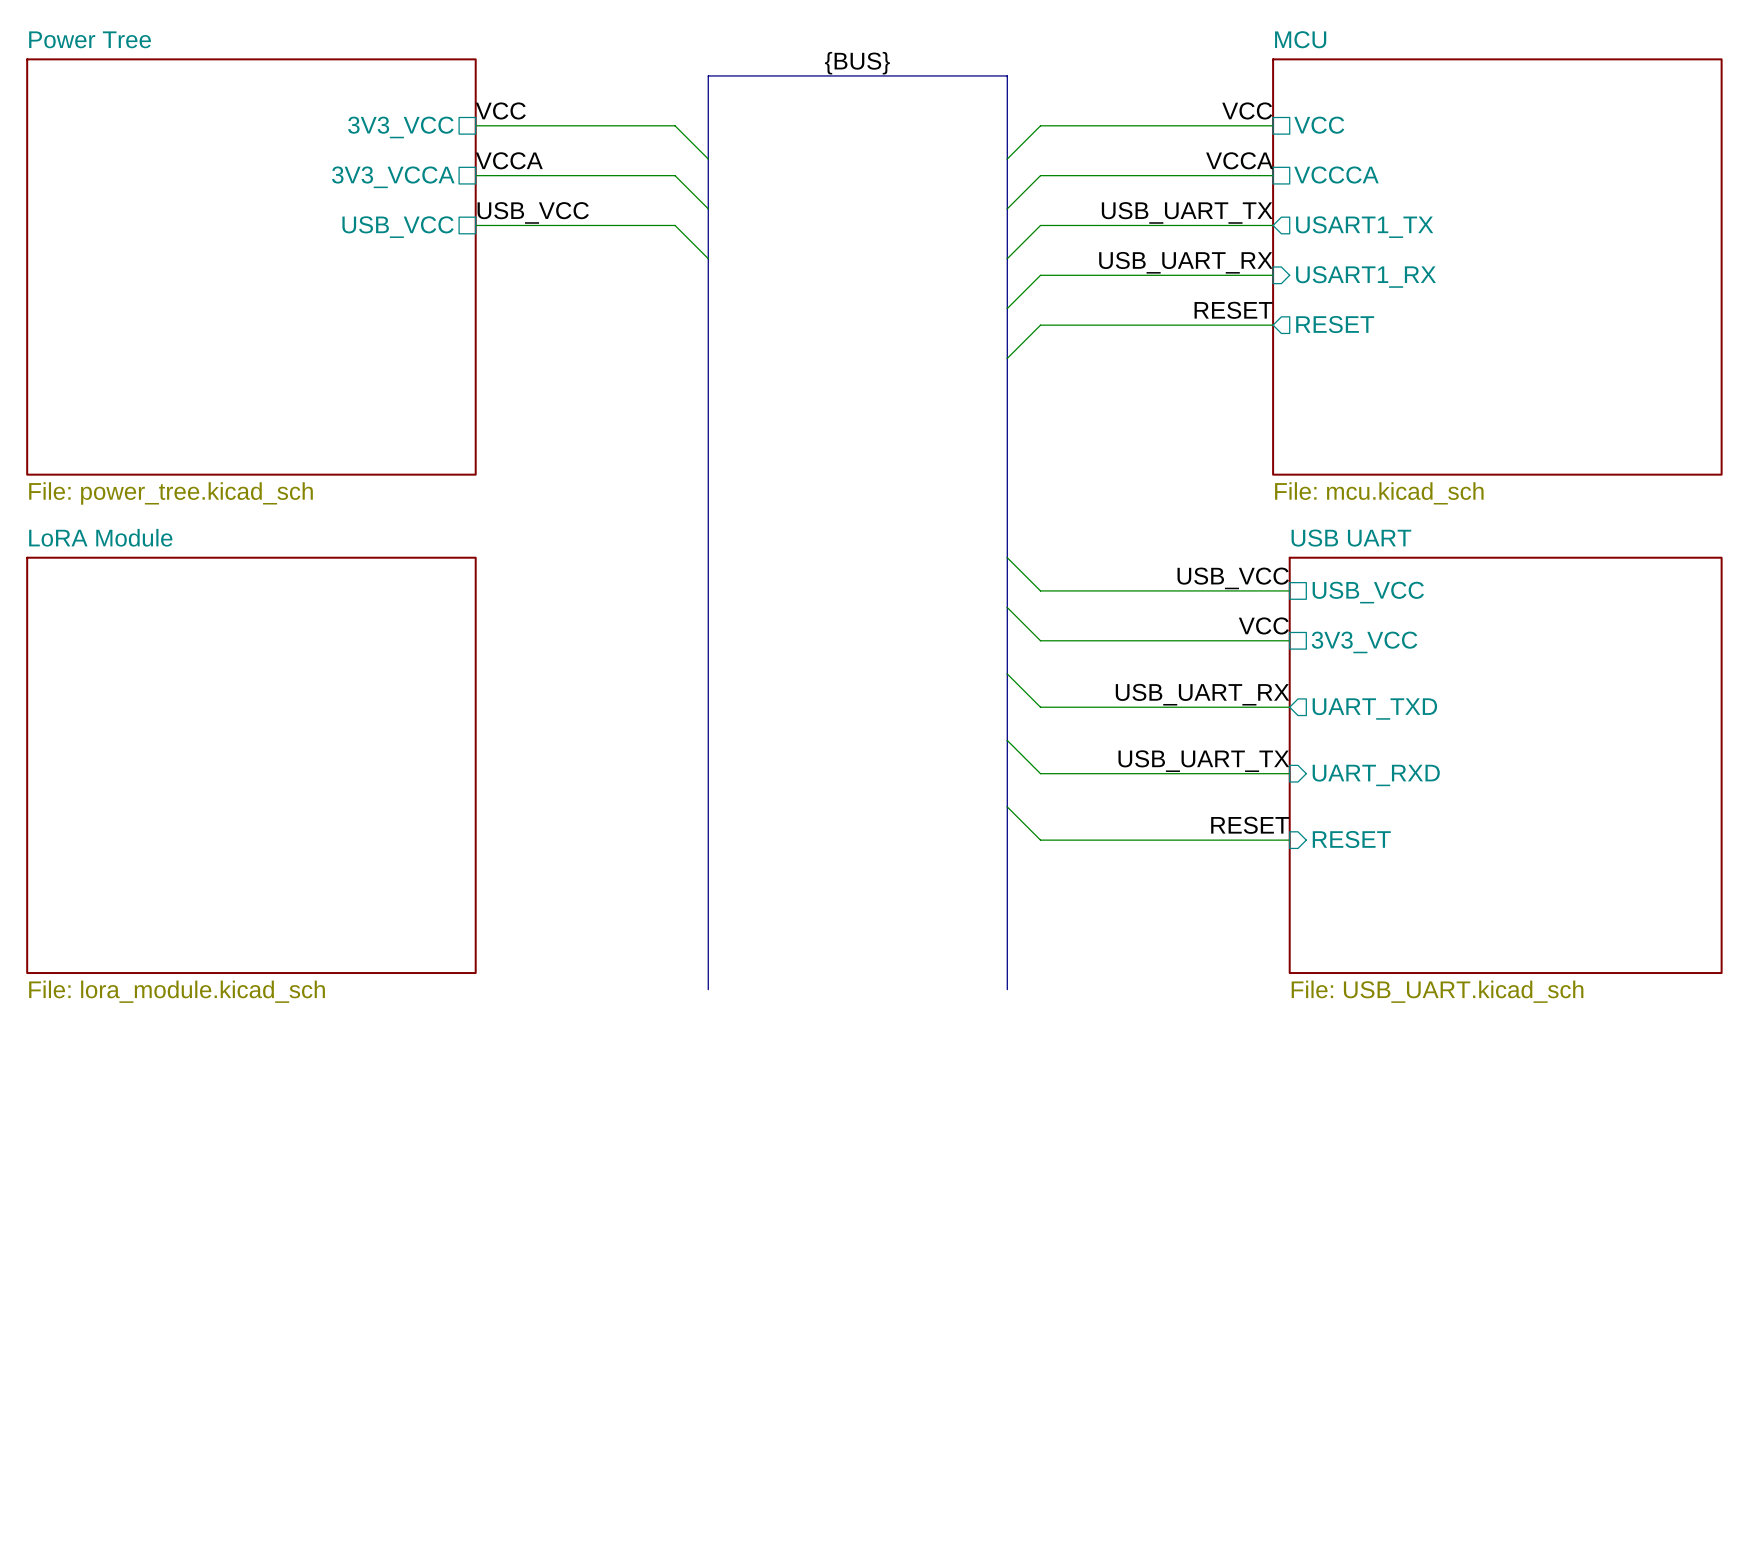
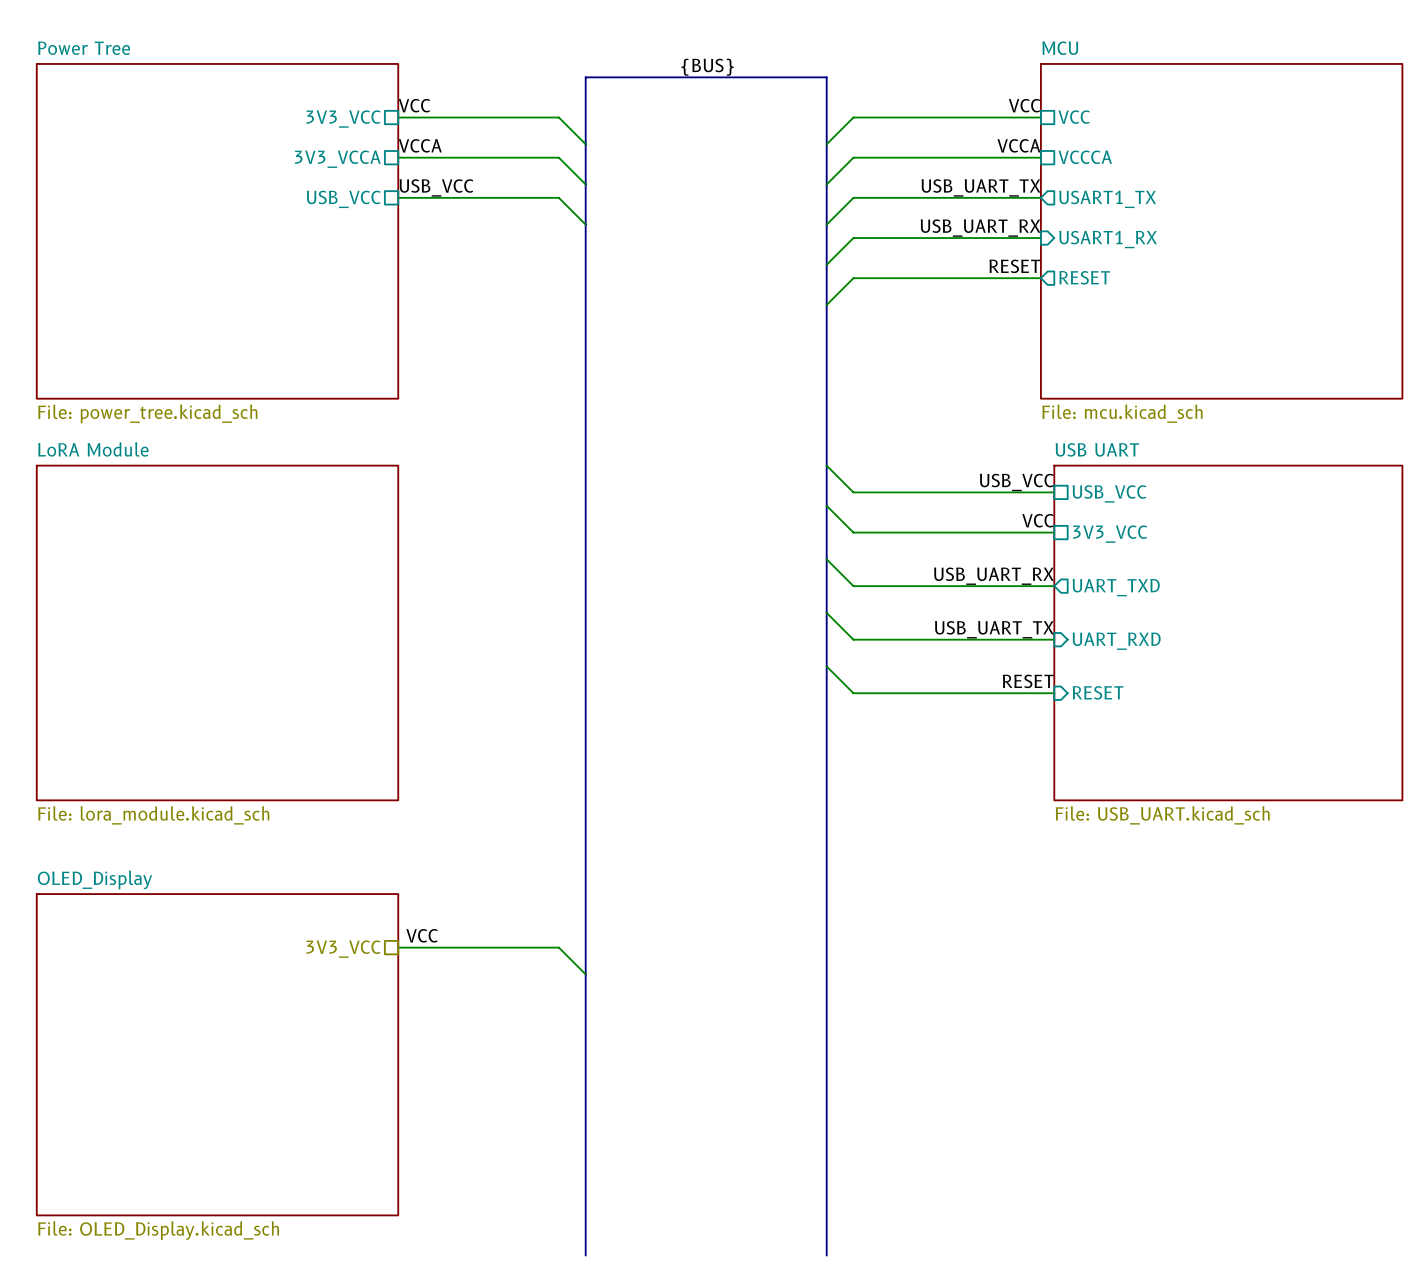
bus: none -> (585, 813) (585, 1255)
bus: none -> (826, 813) (826, 1255)
label: none -> VCC (422, 935)
wire: none -> (398, 947) (558, 947) (585, 974)
hierarchical label: none -> 3V3_VCC (343, 949)
sheet OLED_Display: none -> File: OLED_Display.kicad_sch (217, 1054)

